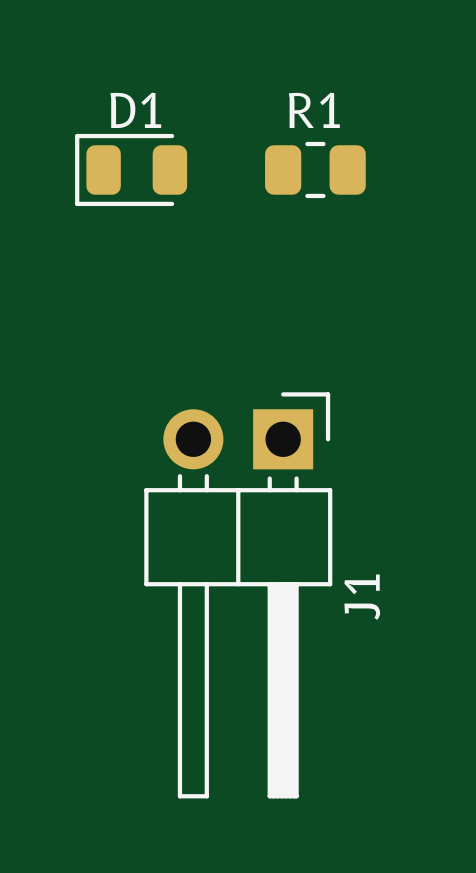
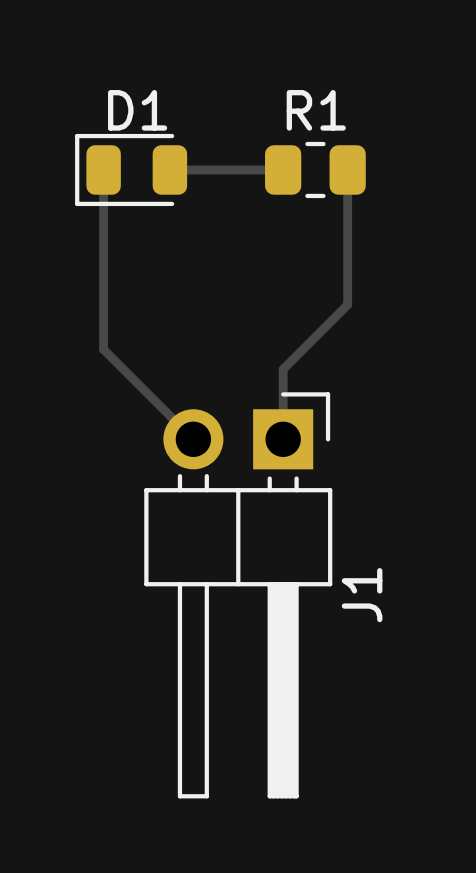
track: none -> (103, 169) (103, 349) (193, 439)
track: none -> (169, 169) (283, 169)
track: none -> (347, 169) (347, 304) (283, 369) (283, 439)

